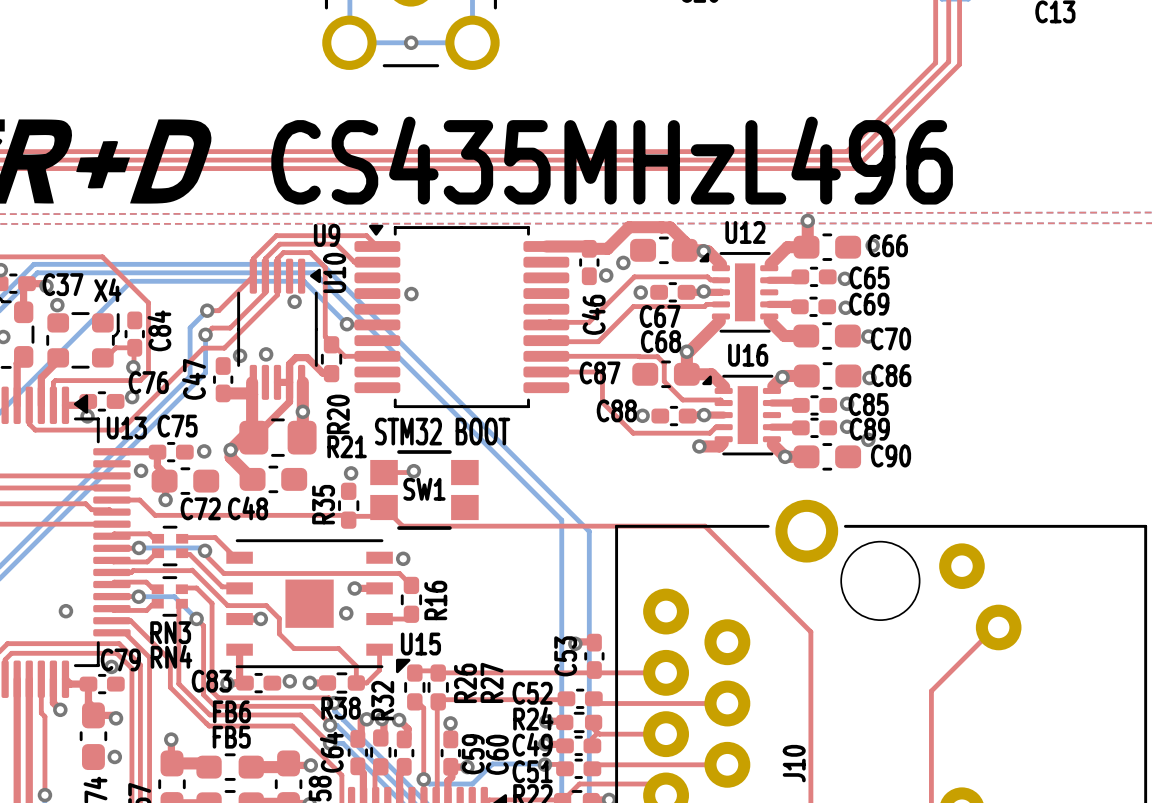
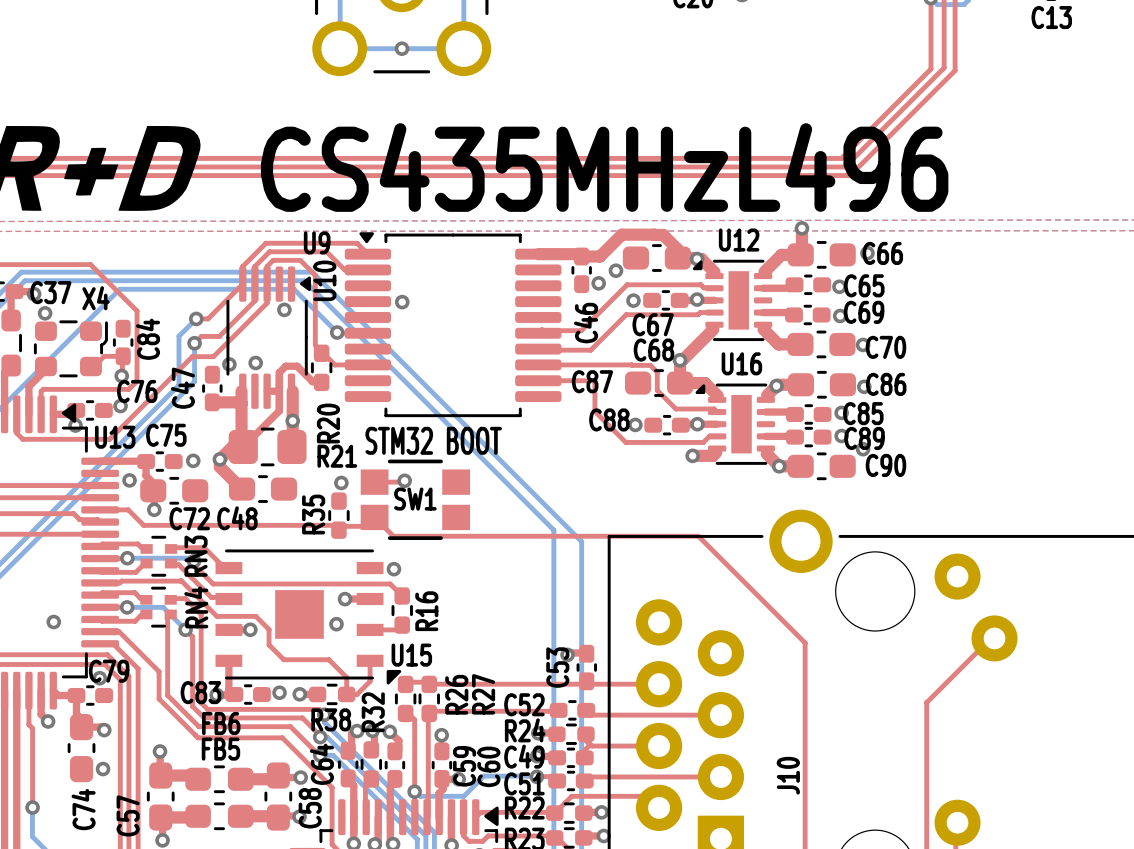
RN3 name rotation: 0° (170, 632) -> 90° counterclockwise (196, 556)
RN3 name position: RN3 (170, 632) -> RN3 (196, 556)
RN4 name rotation: 0° (171, 656) -> 90° counterclockwise (196, 607)
RN4 name position: RN4 (171, 656) -> RN4 (196, 607)

